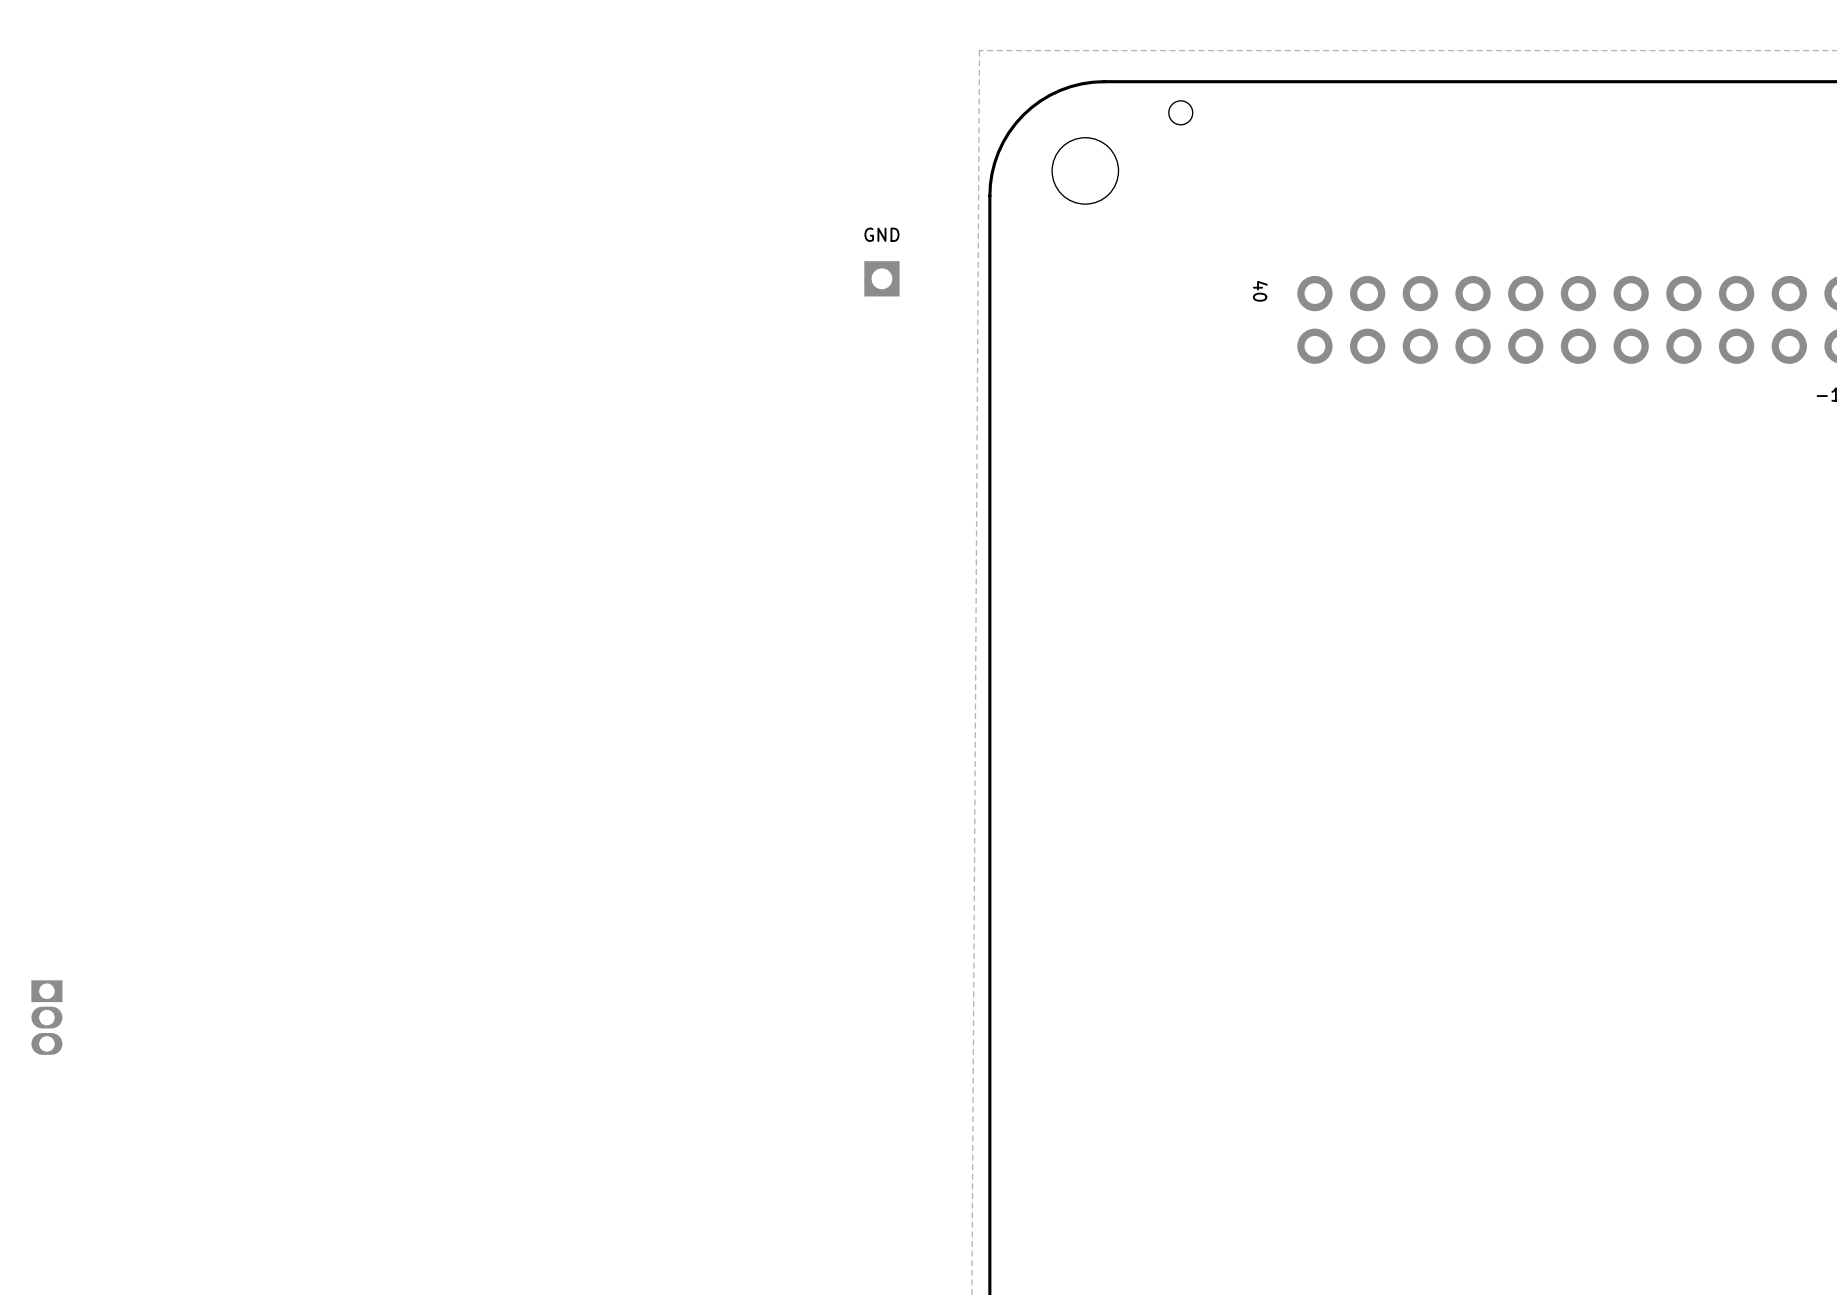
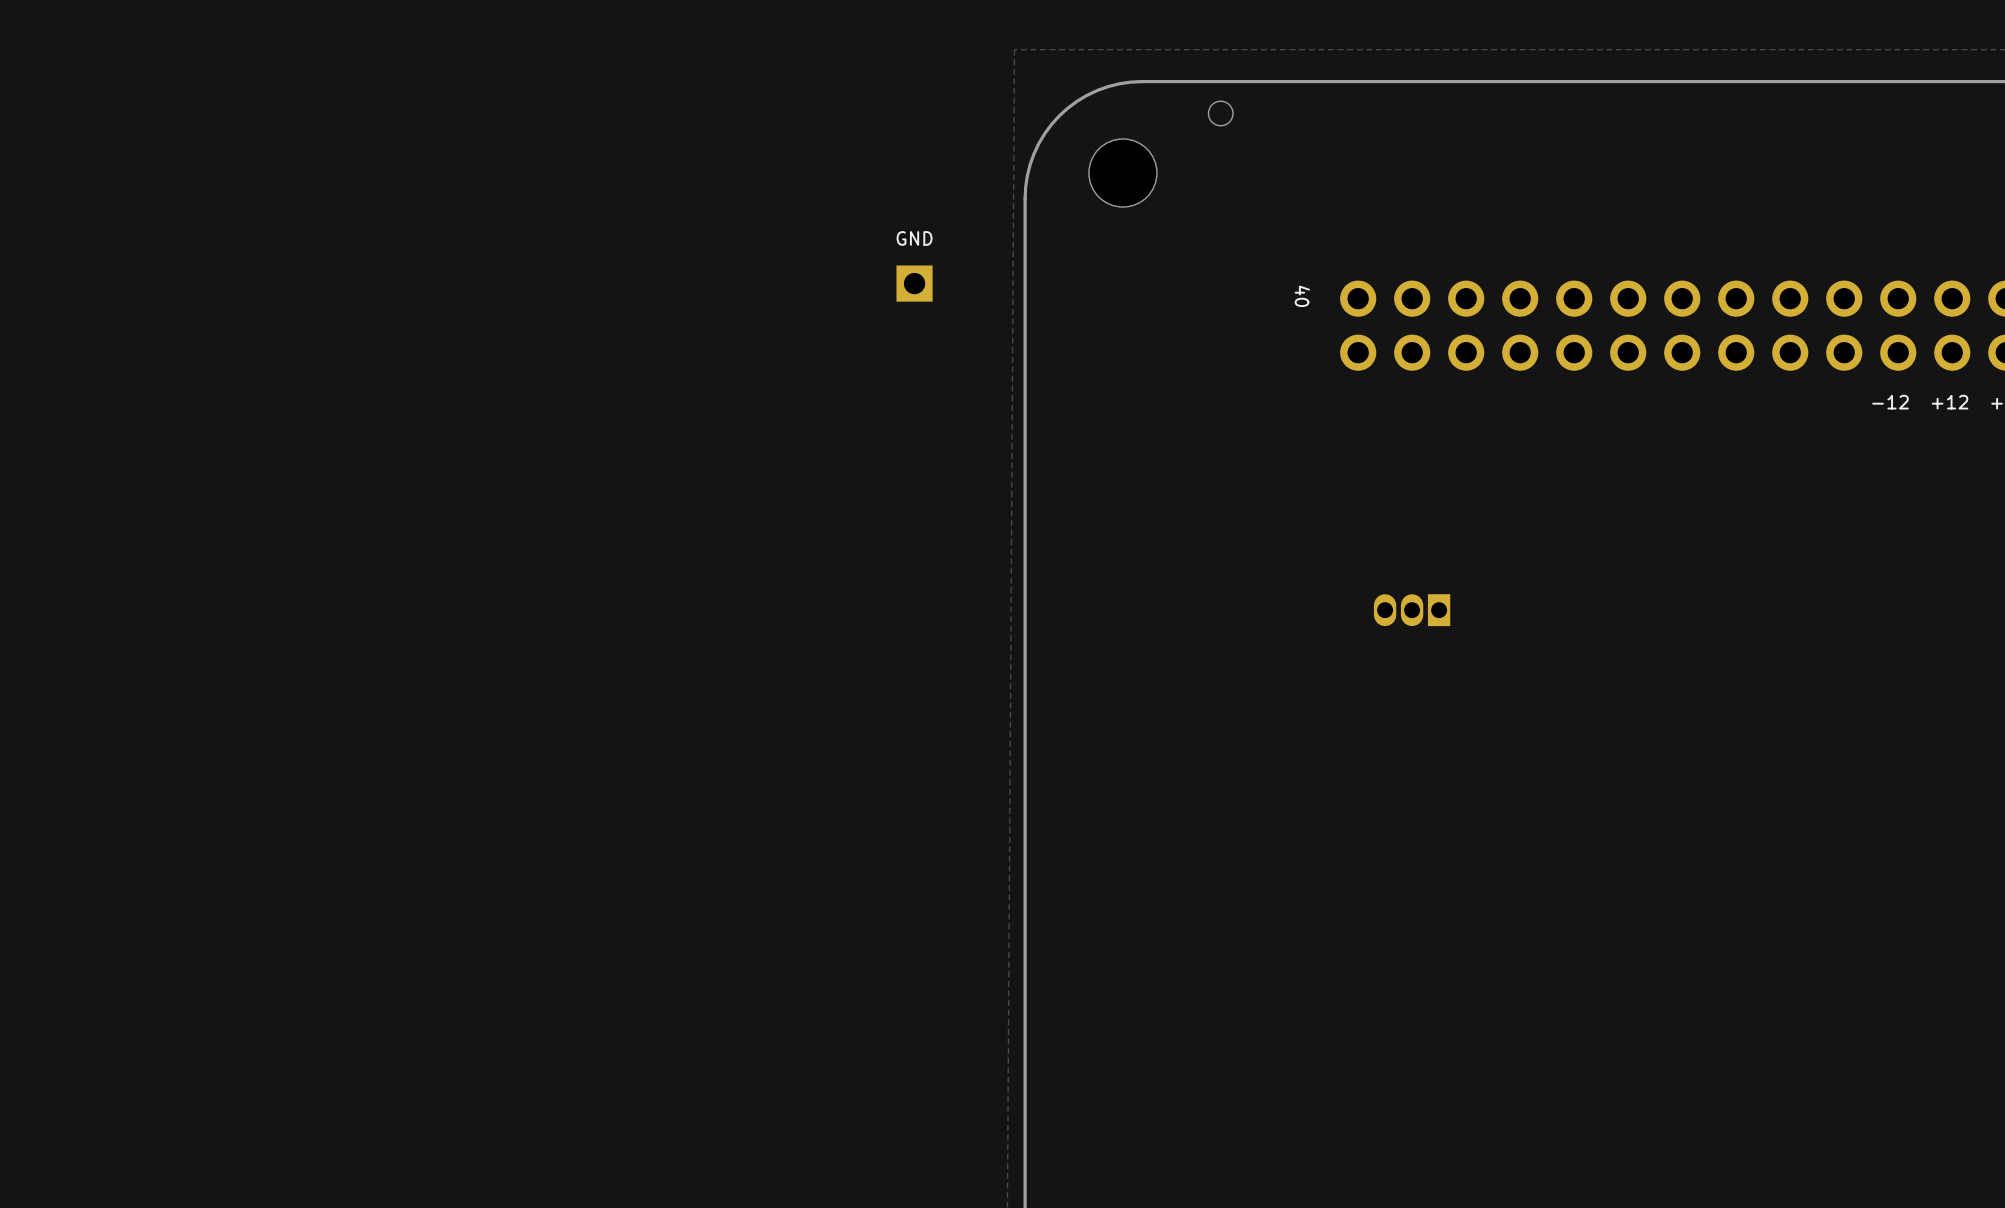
part: none -> (1412, 610)
part: (46, 1017) -> none

